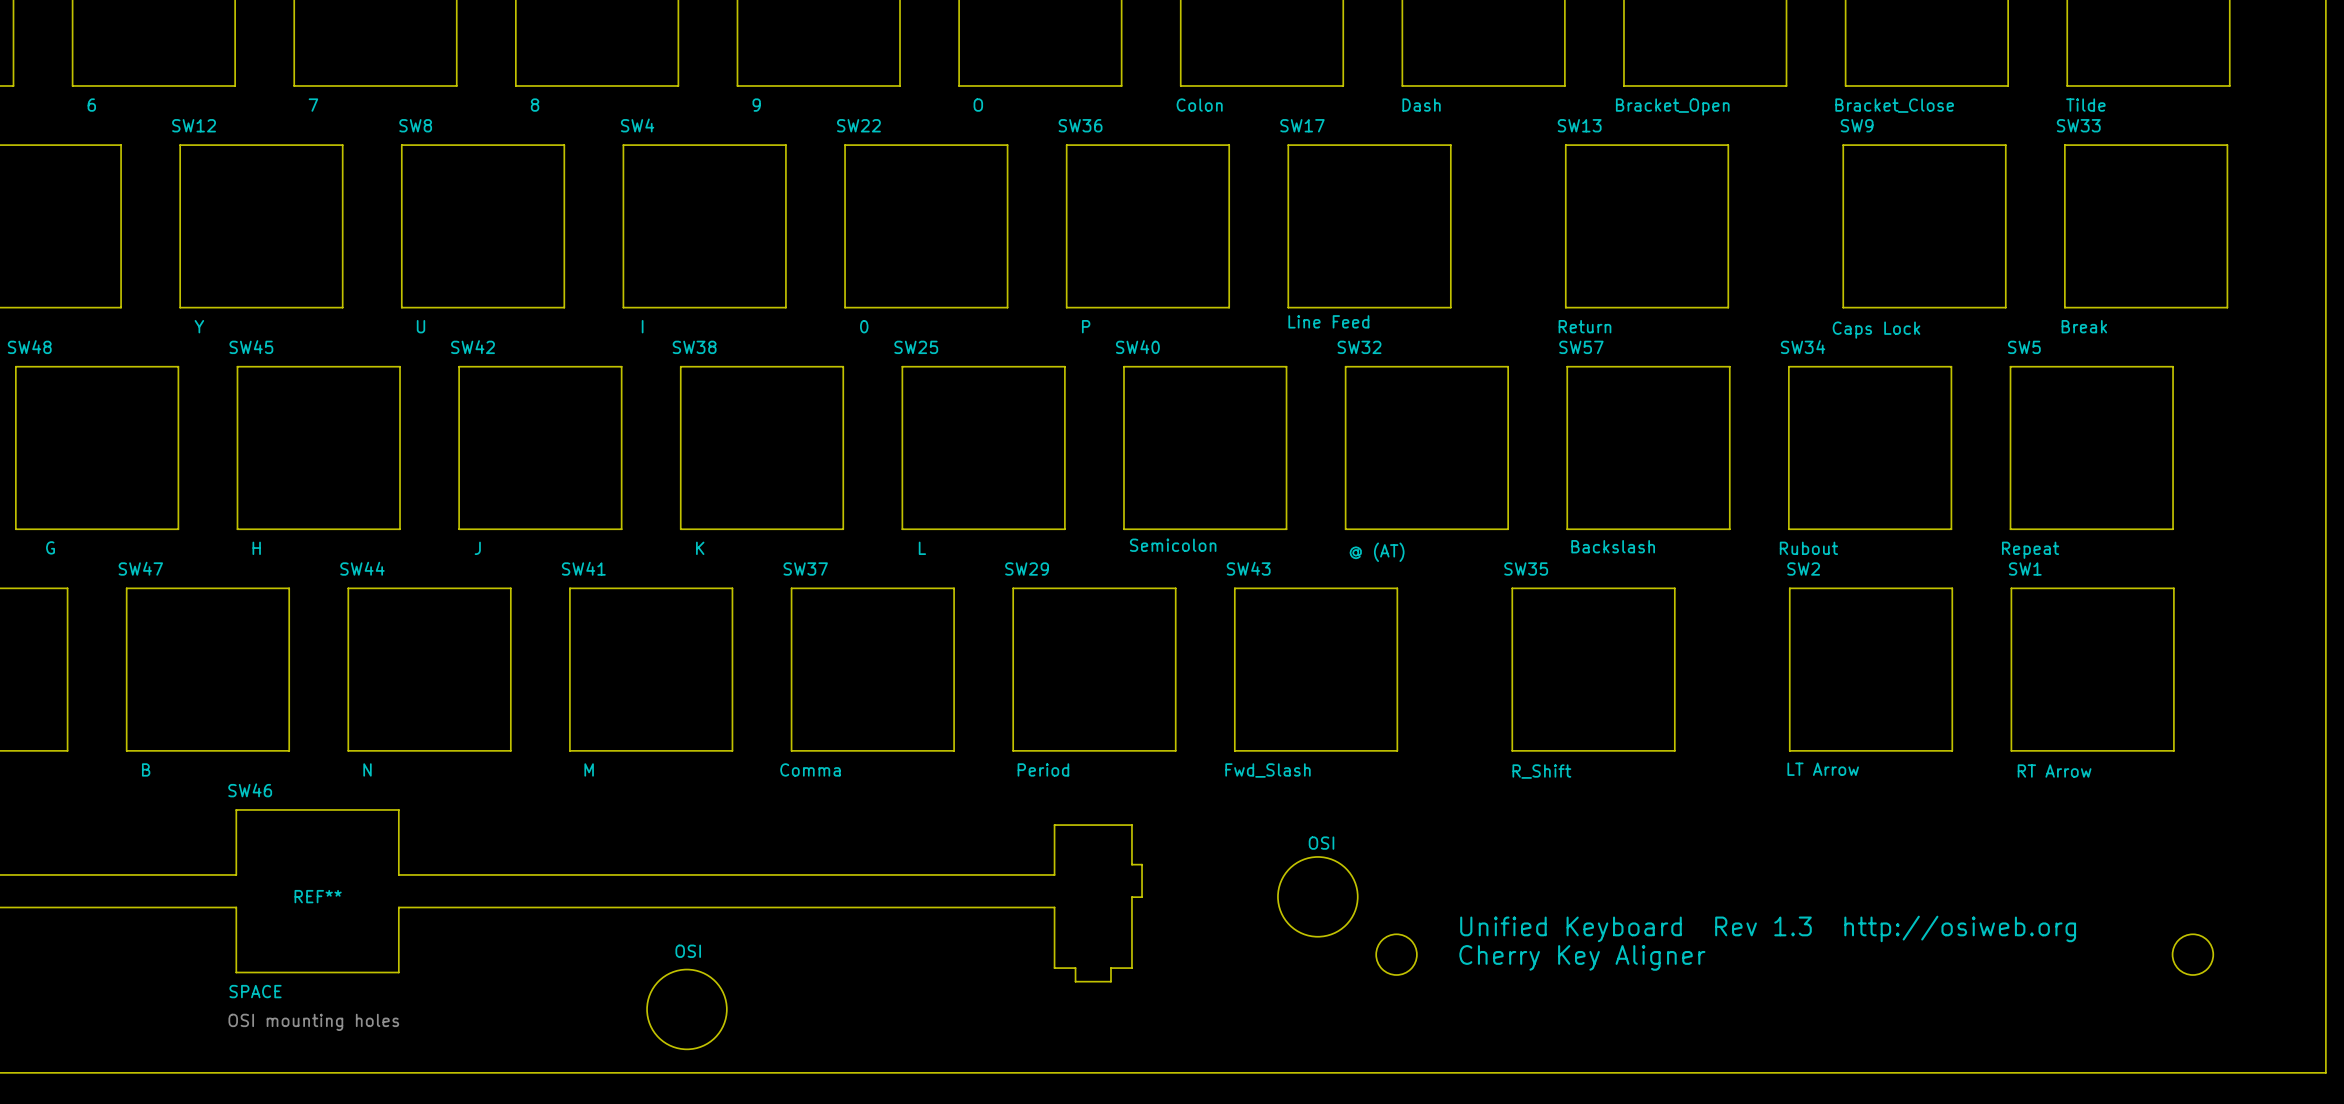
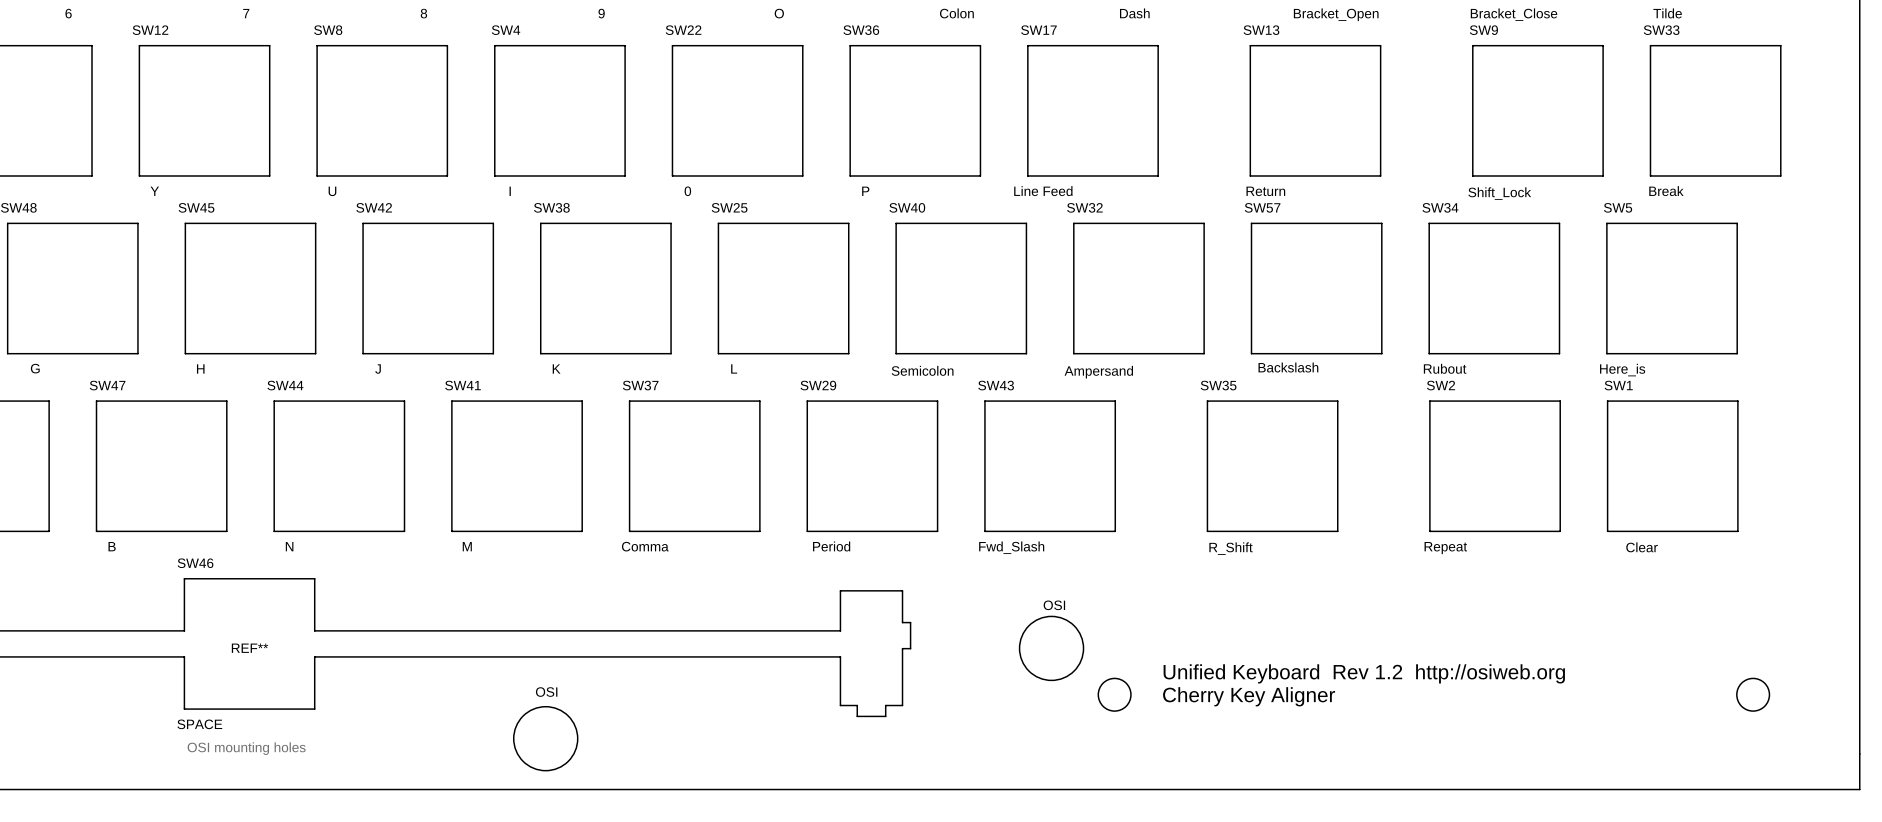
SW17 value position: Line Feed (1328, 321) -> Line Feed (1043, 191)
SW9 value: Caps Lock (1876, 330) -> Shift_Lock (1499, 193)
SW40 value position: Semicolon (1173, 545) -> Semicolon (922, 370)
SW5 value: Repeat (2030, 550) -> Here_is (1622, 370)
SW32 value: @ (AT) (1377, 552) -> Ampersand (1098, 372)
SW2 value: LT Arrow (1823, 769) -> Repeat (1445, 548)
SW1 value: RT Arrow (2054, 771) -> Clear (1642, 547)
text: Unified Keyboard Rev 1.3 http://osiweb.org (1768, 928) -> Unified Keyboard Rev 1.2 http://osiweb.org (1364, 673)

